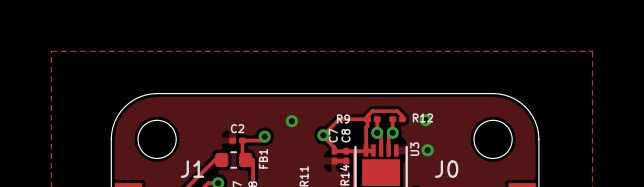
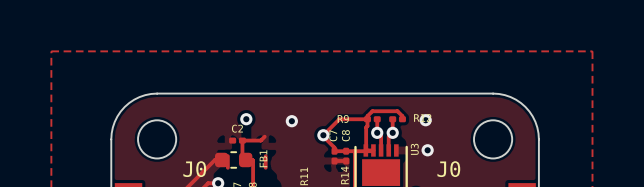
via position: (264, 136) -> (246, 119)
track: none -> (227, 156) (227, 167)
track: none -> (265, 156) (265, 167)
J1 name: J1 (192, 169) -> J0 (194, 169)

